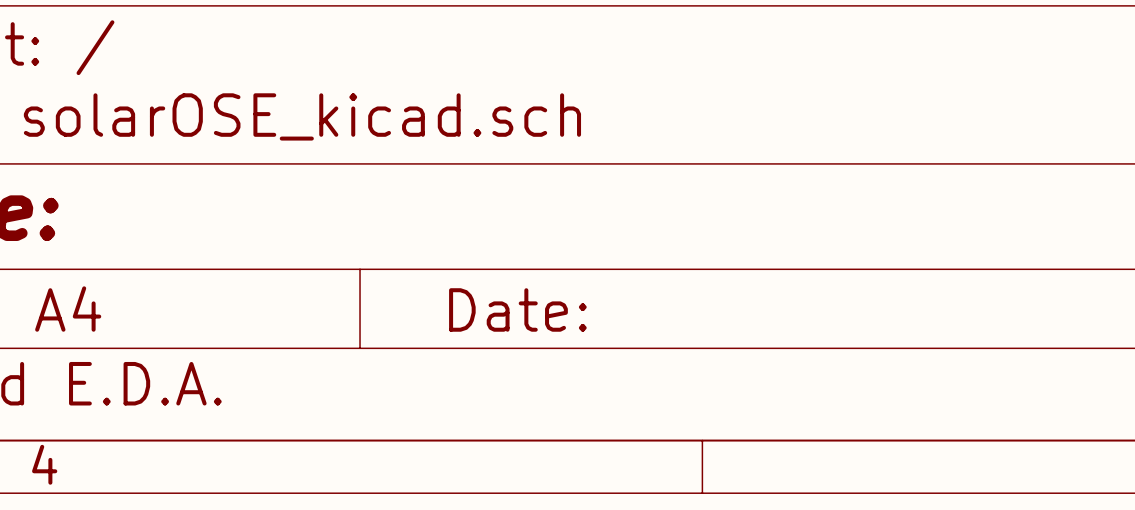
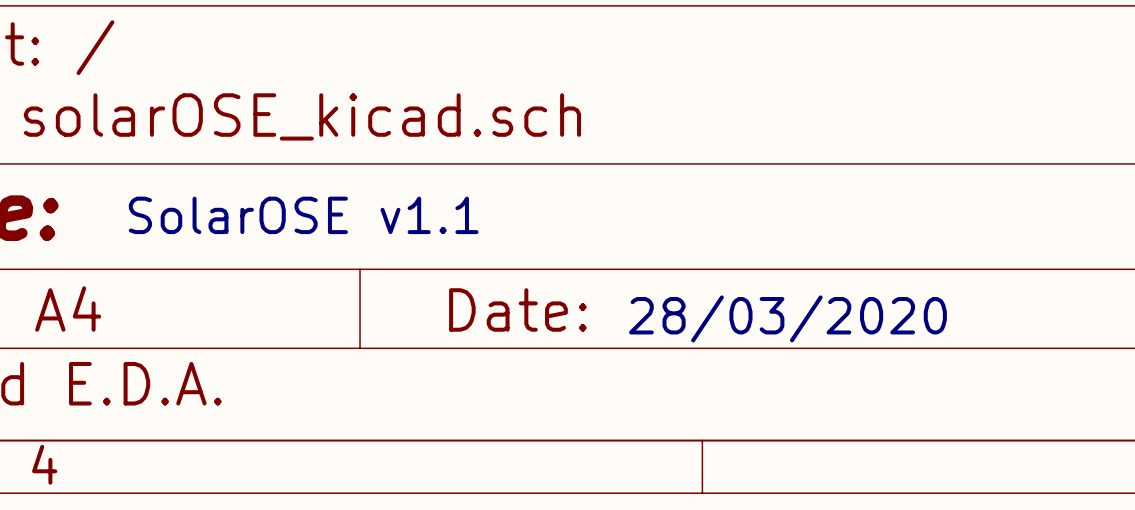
text: none -> SolarOSE v1.1 (303, 215)
text: none -> 28/03/2020 (787, 318)

